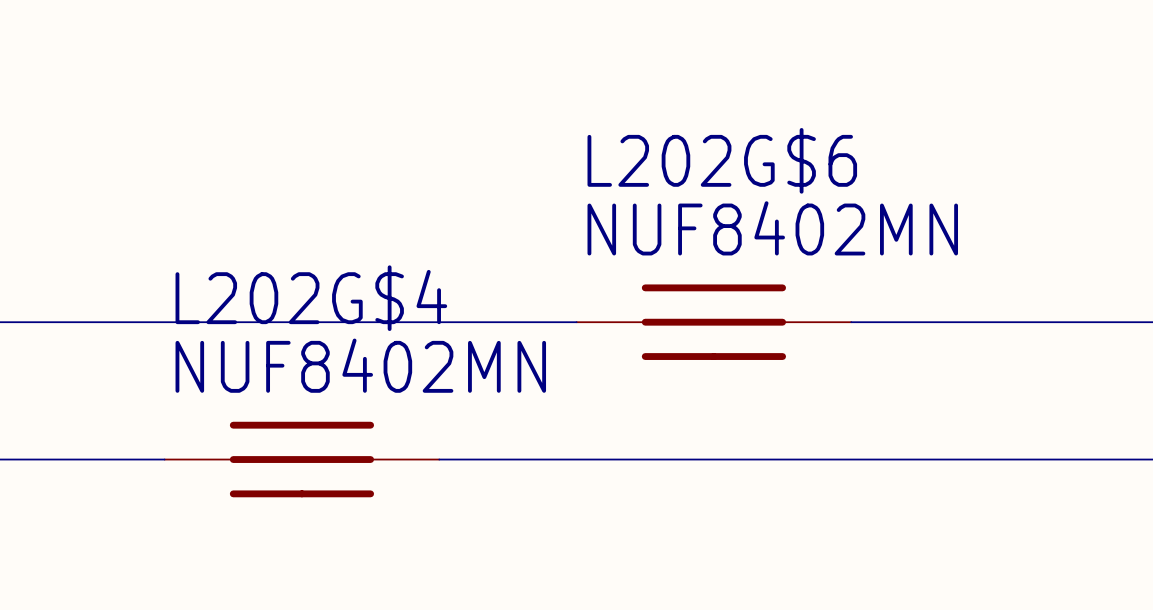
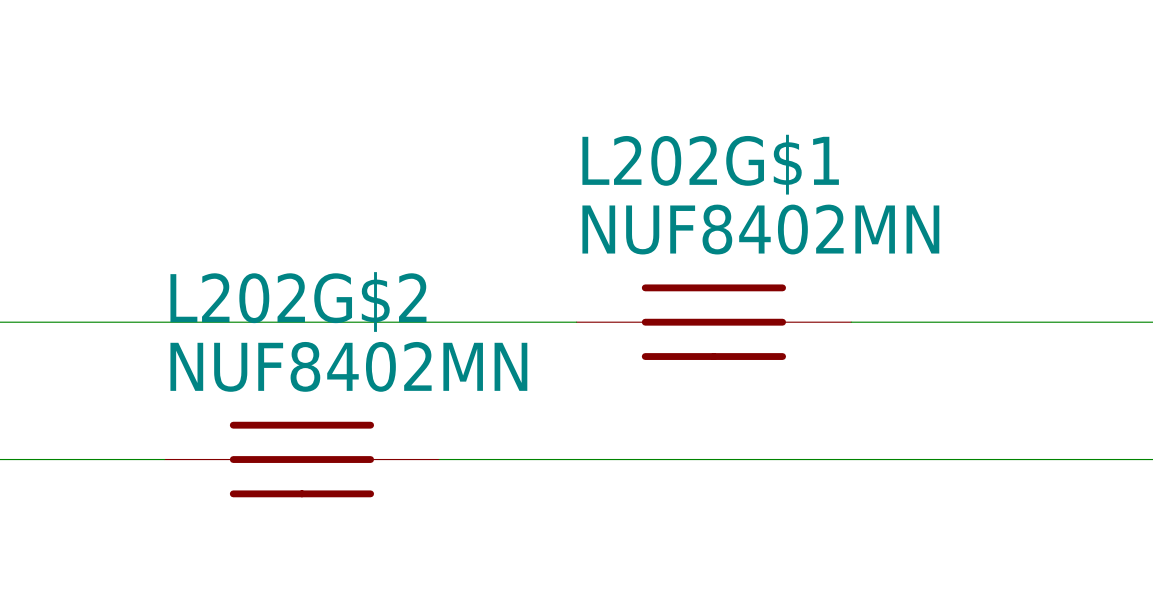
L202G$6 name: L202G$6 (722, 160) -> L202G$1 (710, 164)
L202G$4 name: L202G$4 (311, 298) -> L202G$2 (298, 302)

